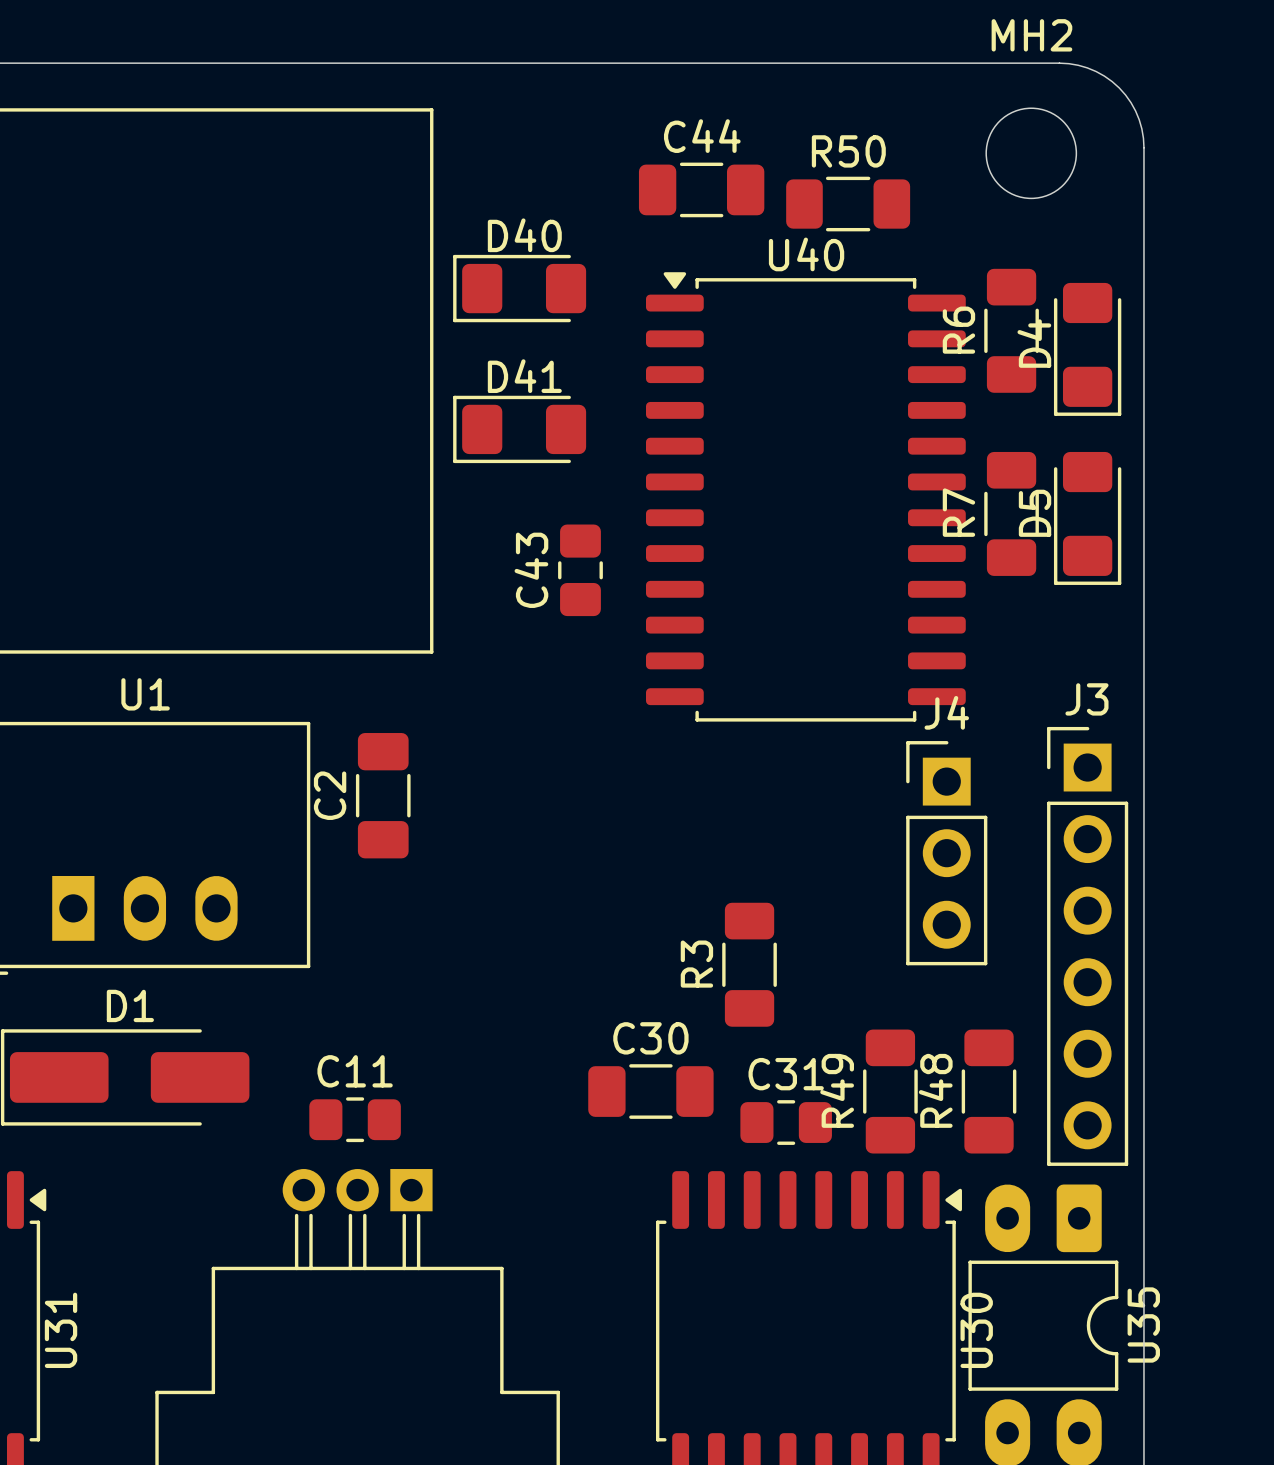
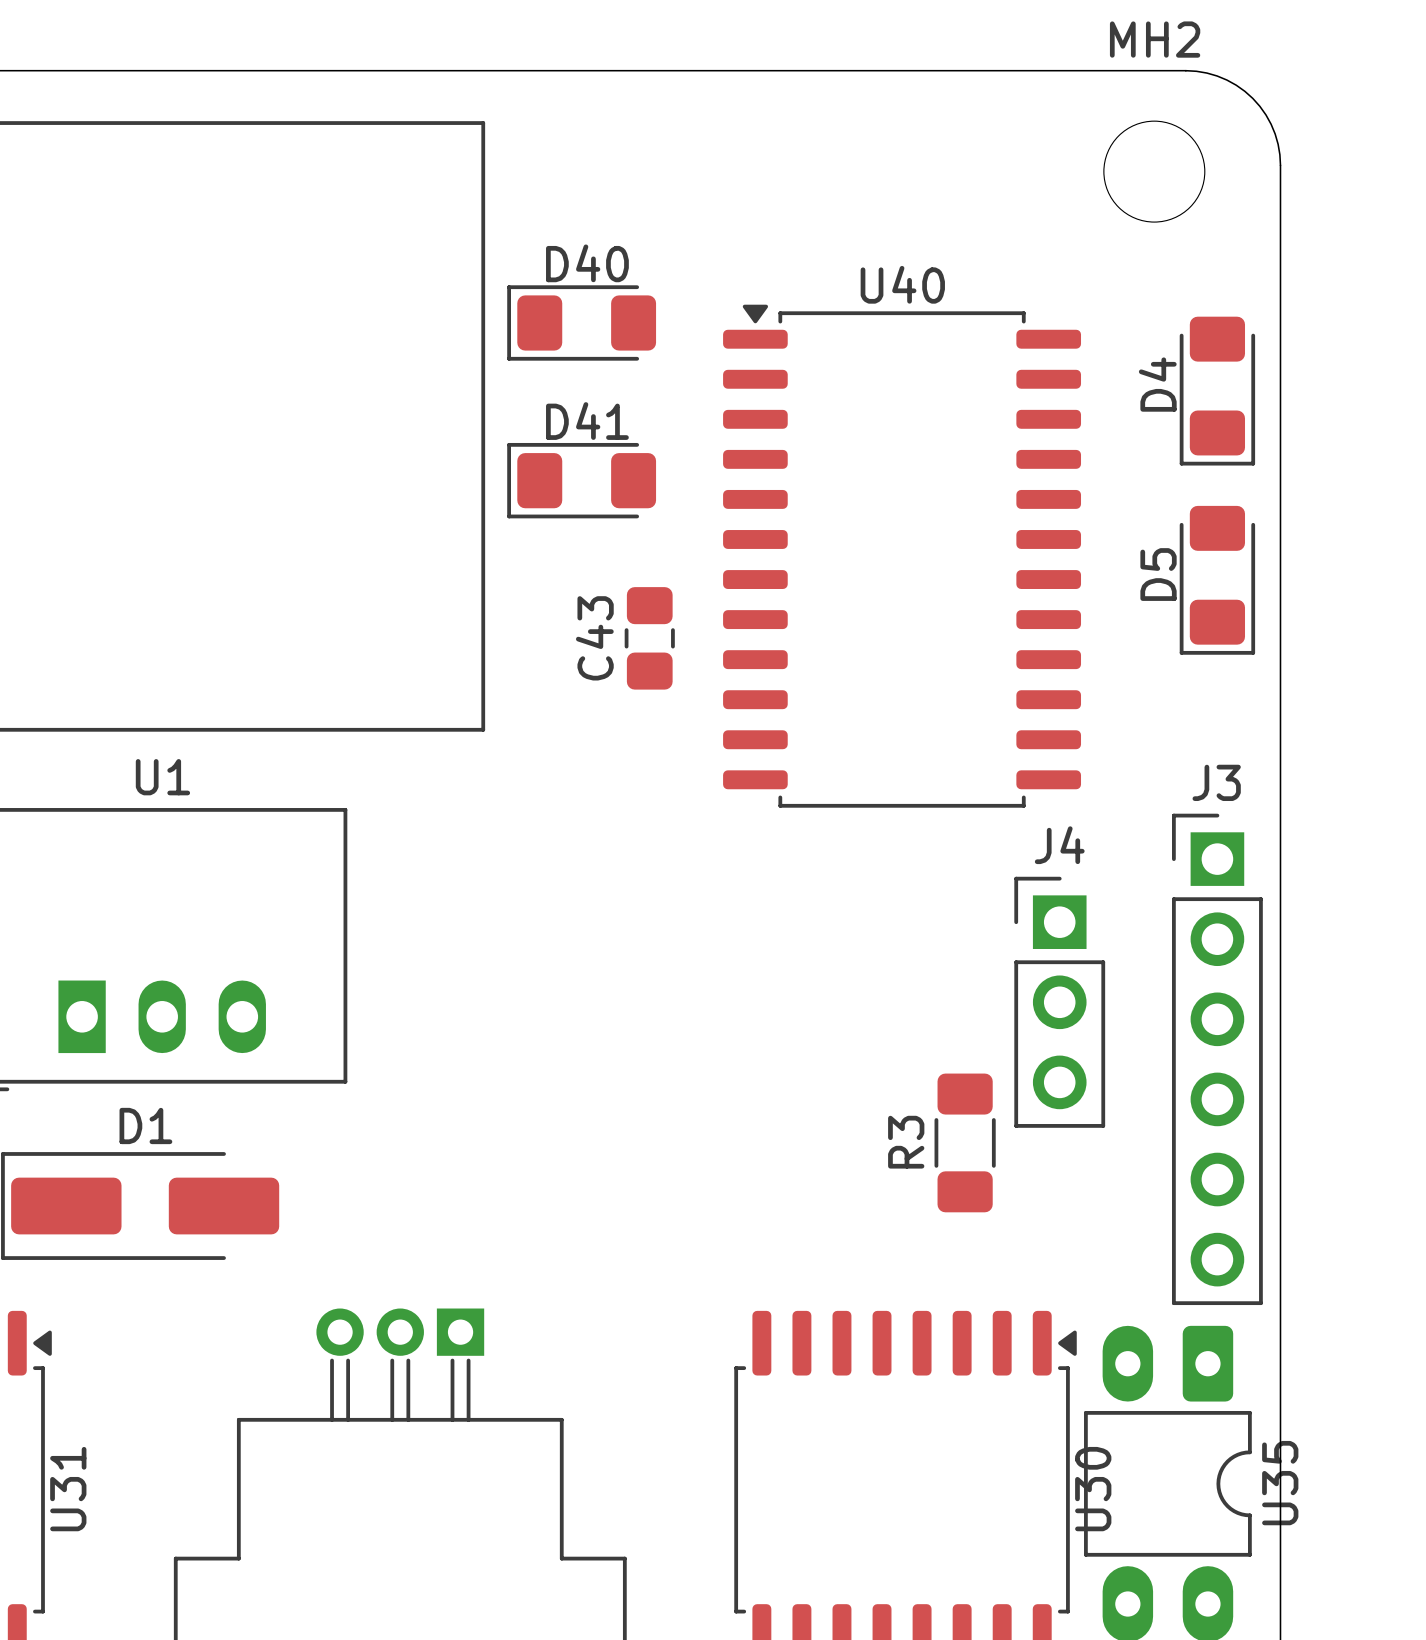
C44: (701, 189) -> none
R50: (848, 204) -> none
R6: (1011, 330) -> none
R7: (1011, 513) -> none
C2: (383, 795) -> none
J4 position: (946, 853) -> (1059, 1002)
R3 position: (749, 964) -> (965, 1142)
C30: (650, 1091) -> none
R49: (890, 1091) -> none
R48: (989, 1091) -> none
C11: (355, 1119) -> none
C31: (786, 1122) -> none

